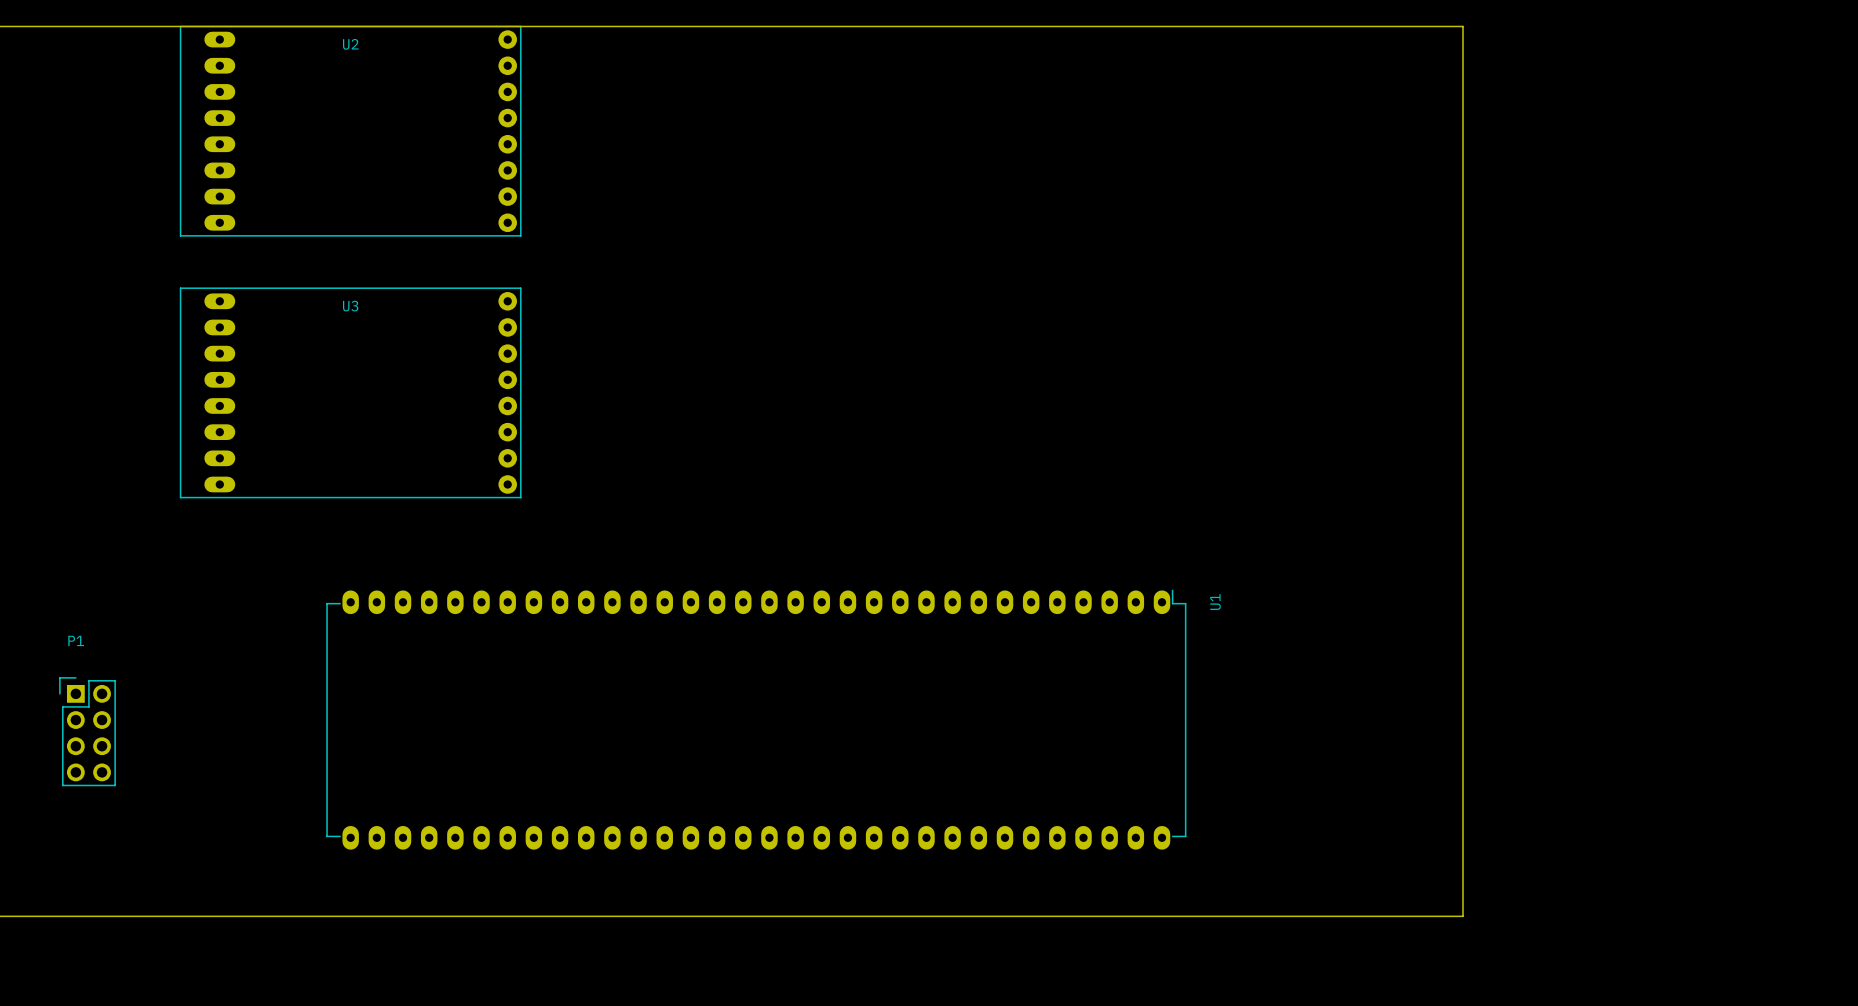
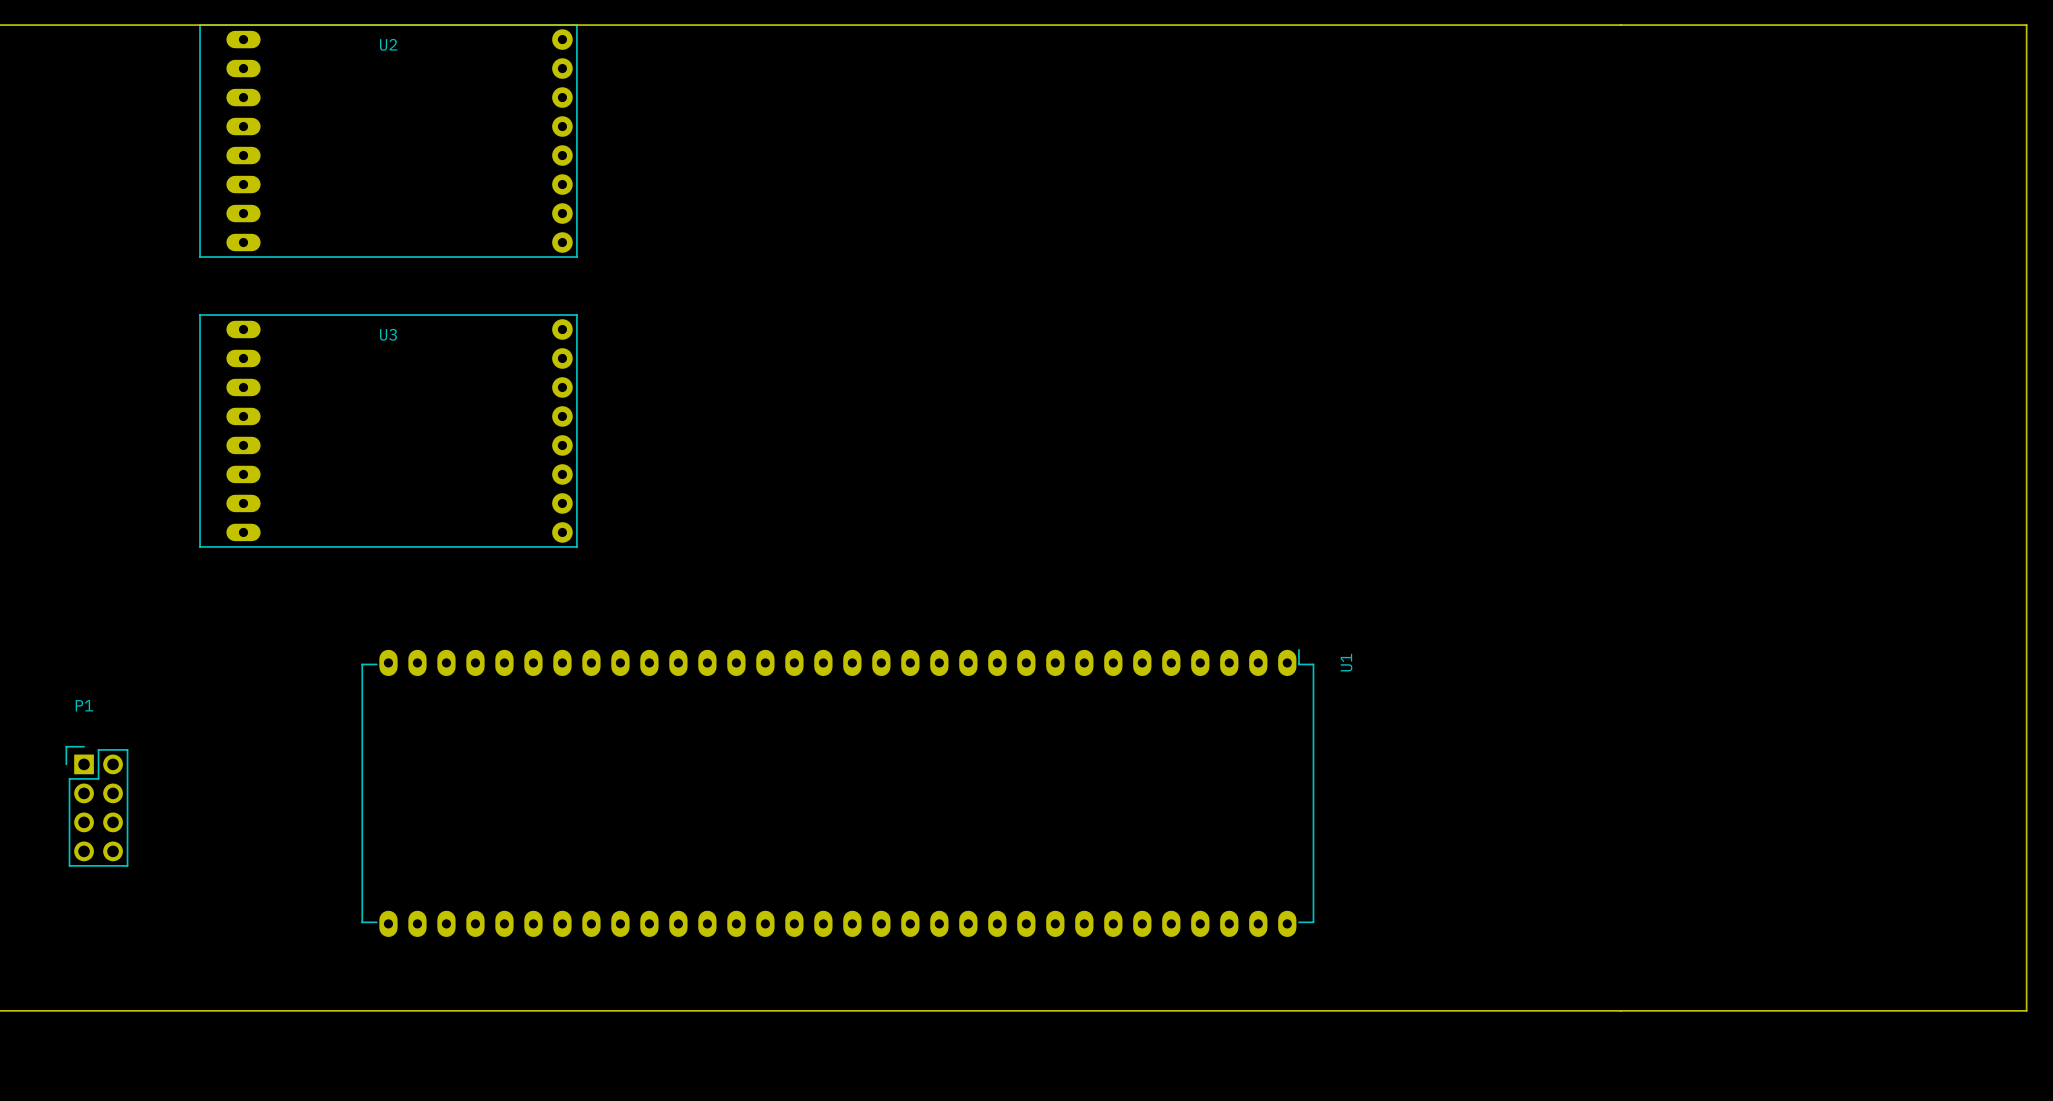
board edge: (1462, 26) (1462, 916) -> (1620, 25) (2026, 25) (2026, 1010) (1620, 1010)

